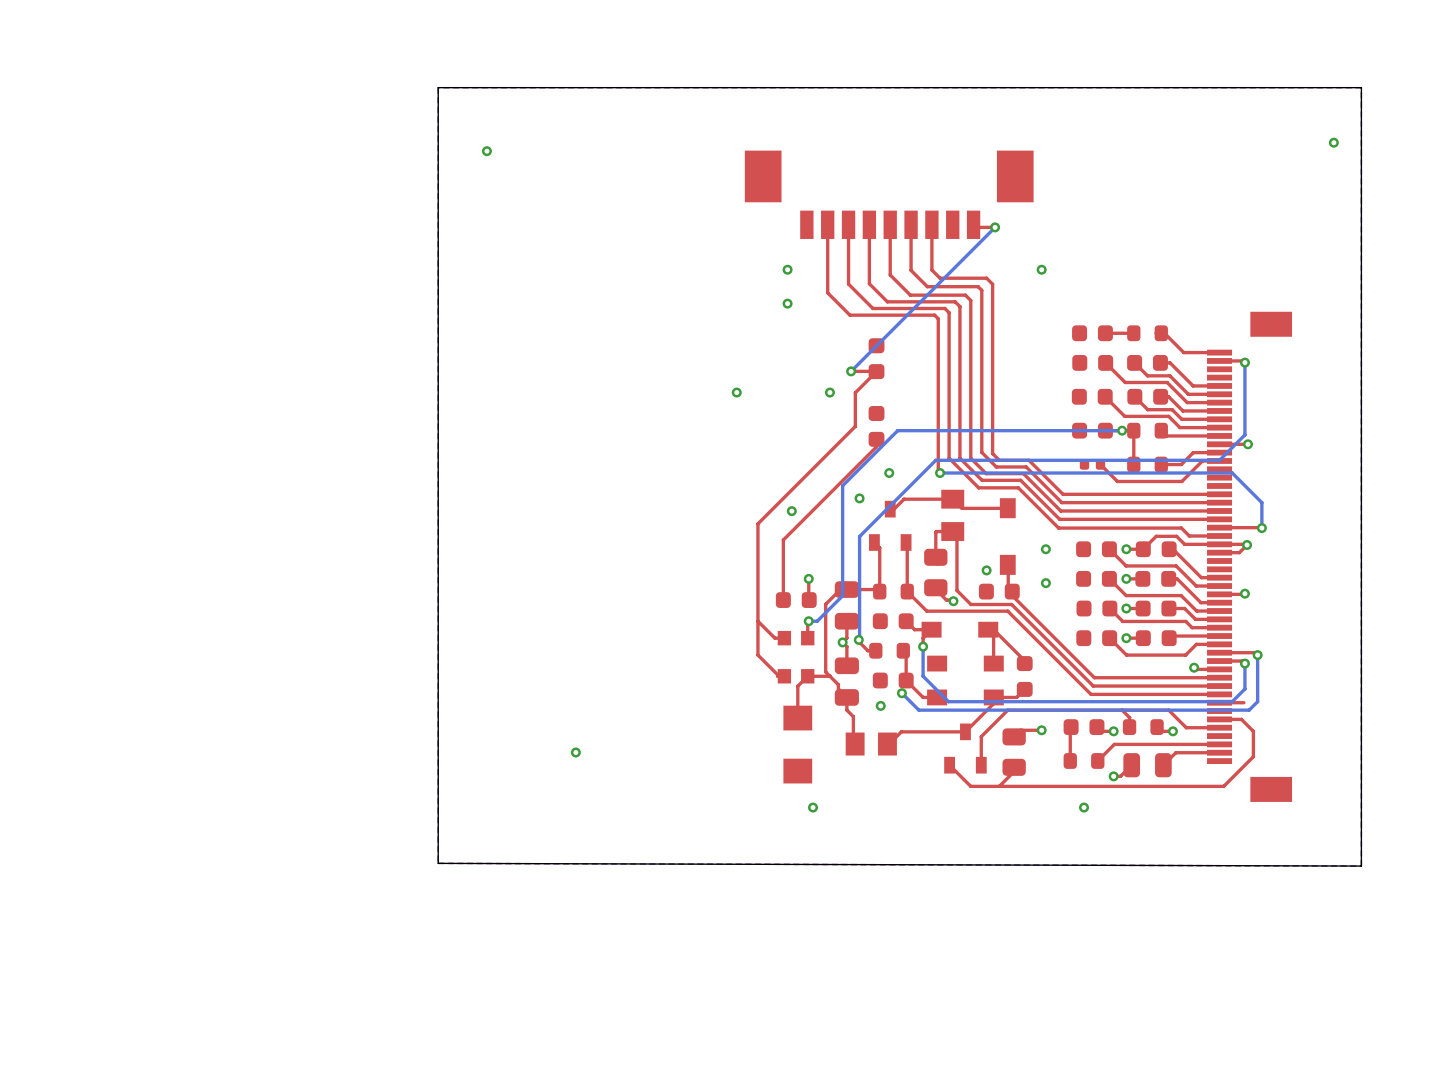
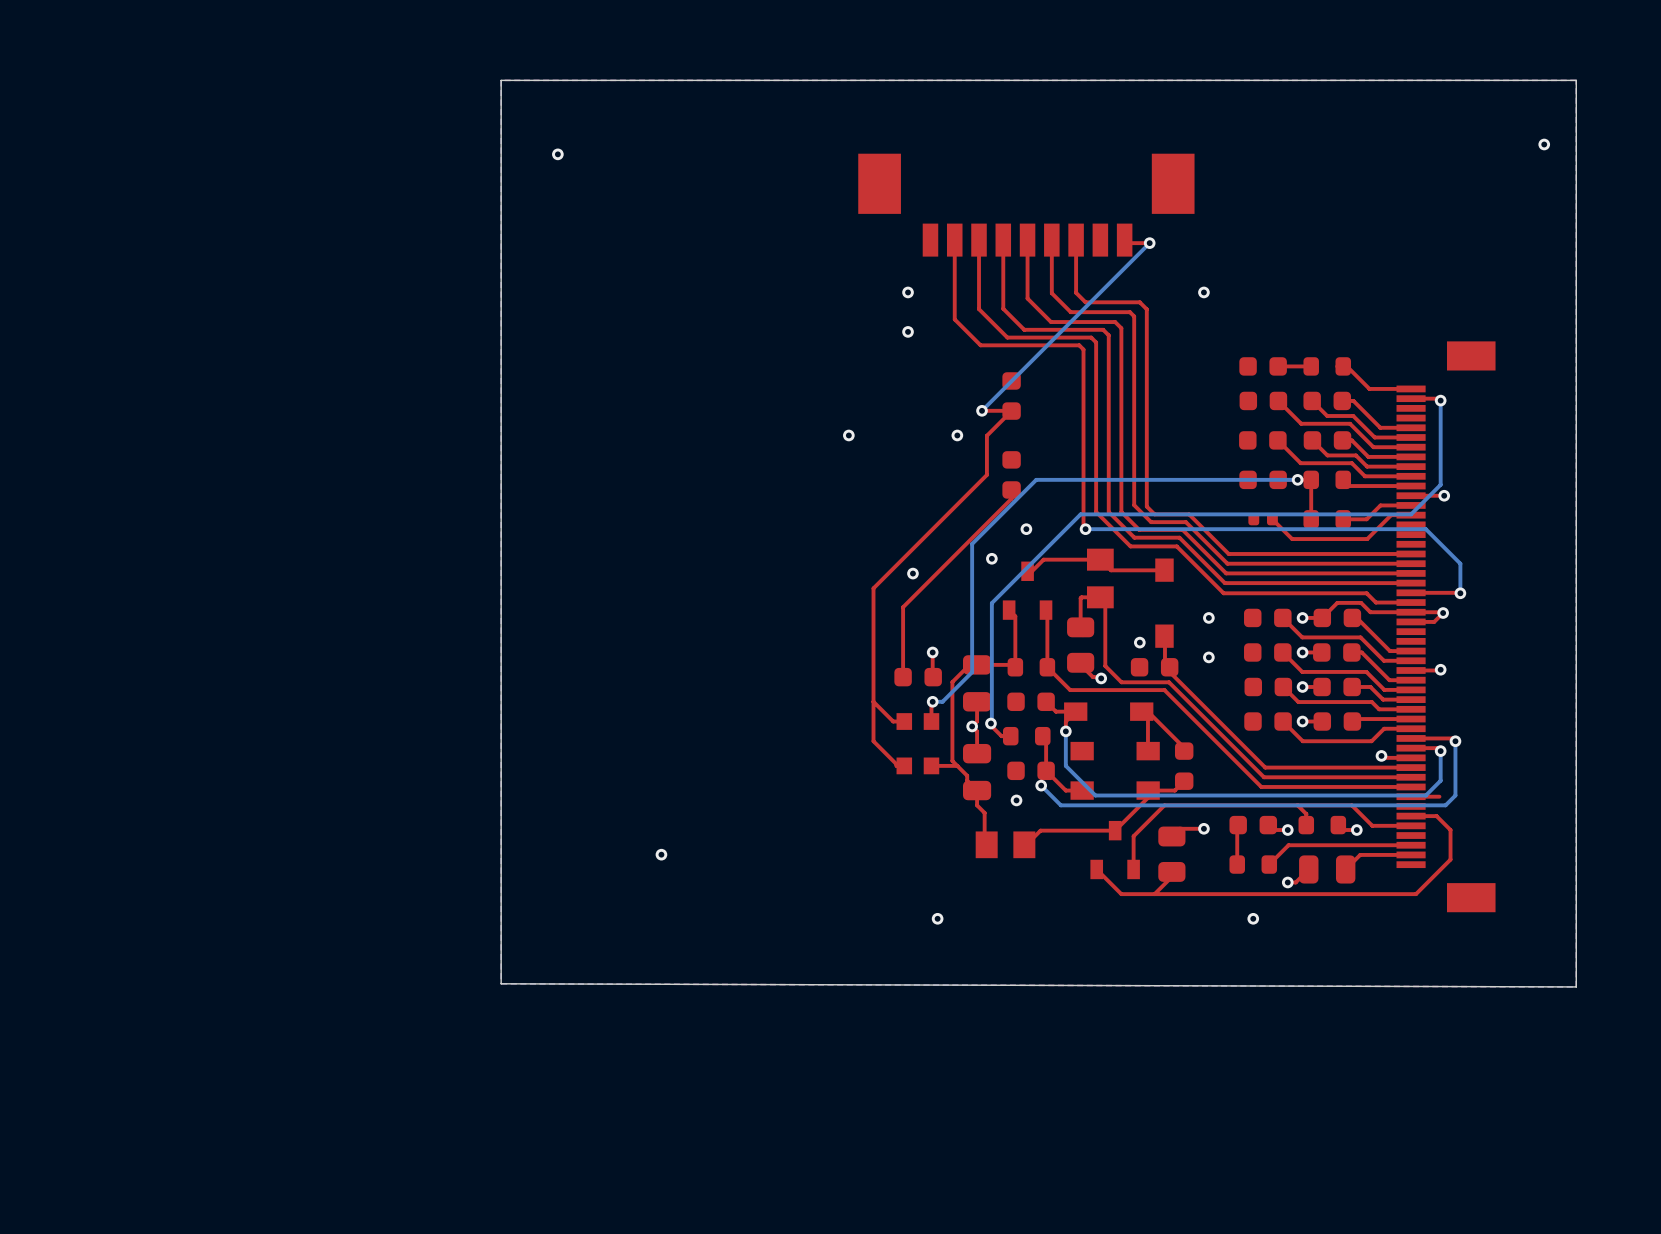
top track: (807, 676) (797, 686) (797, 718) -> none
part: (797, 744) -> none

